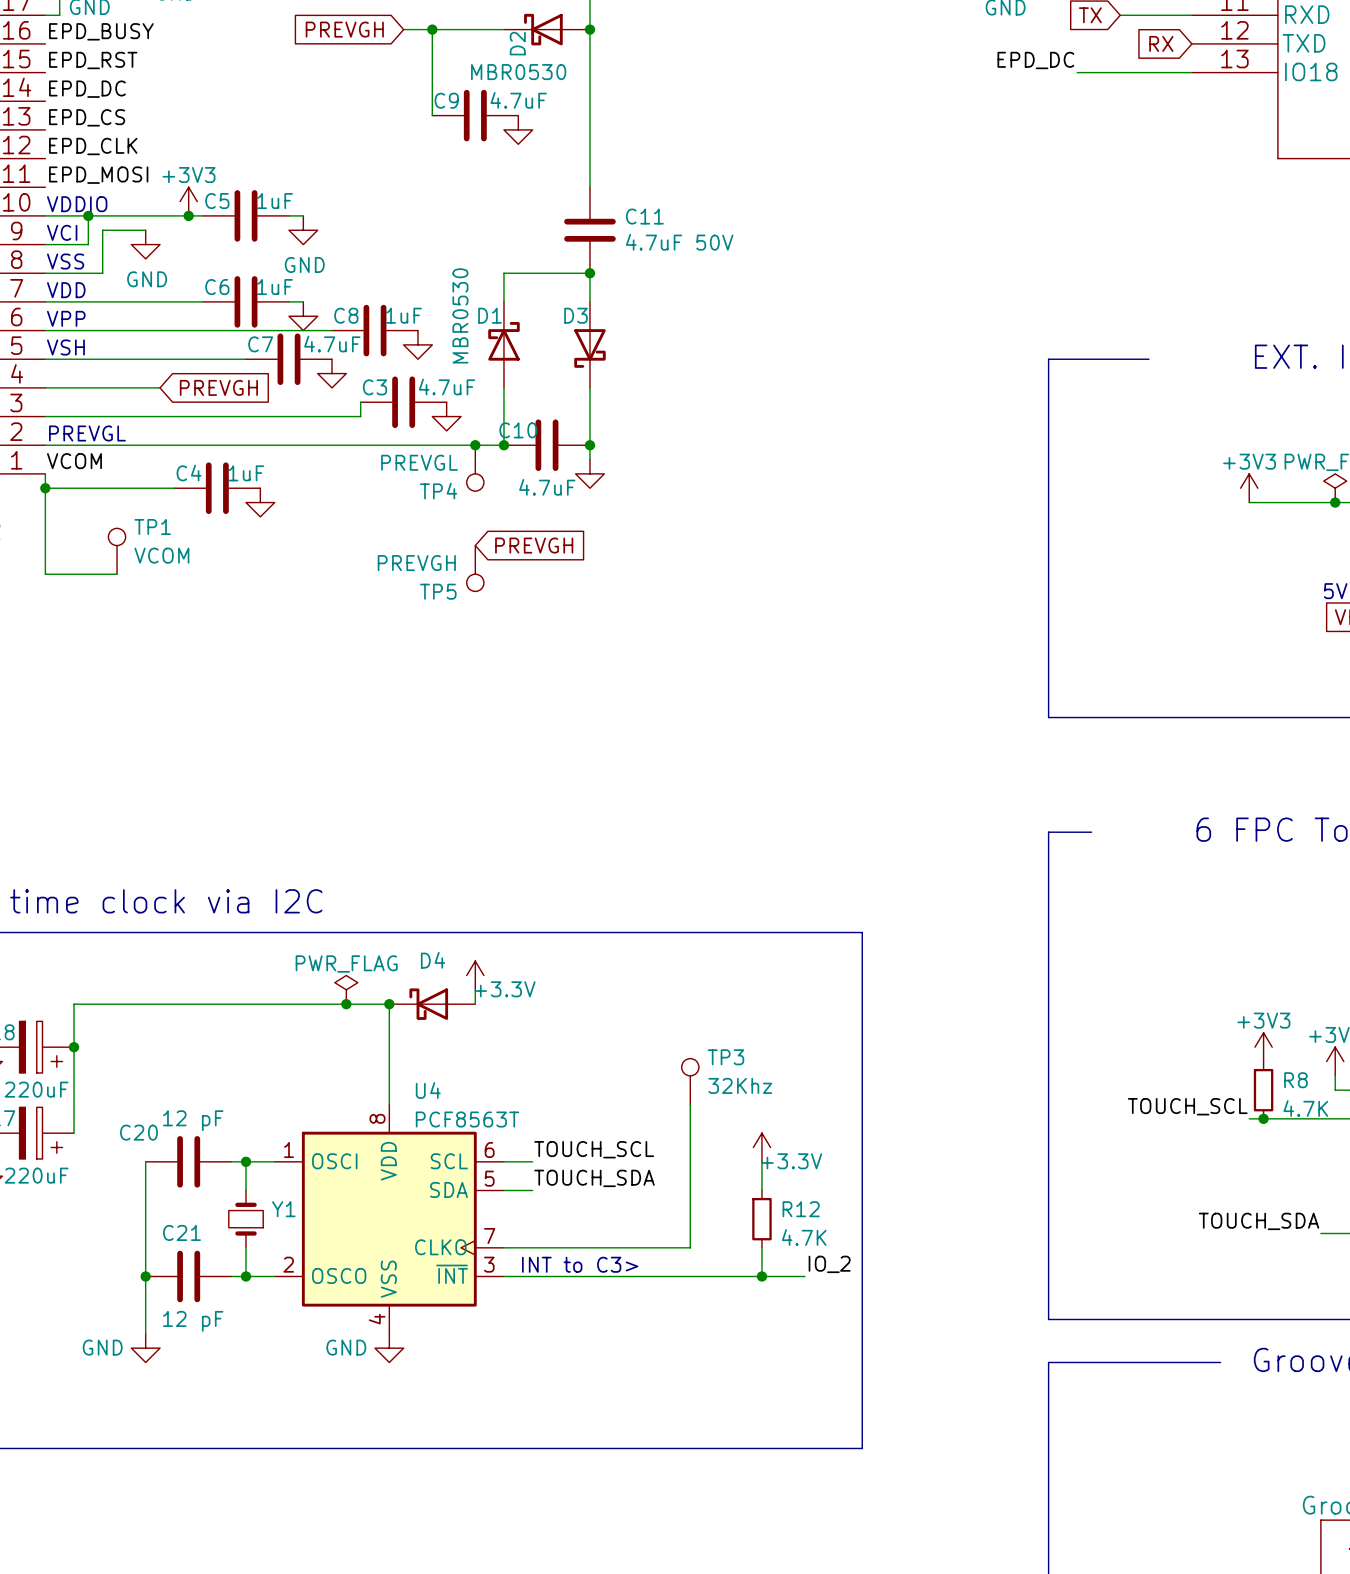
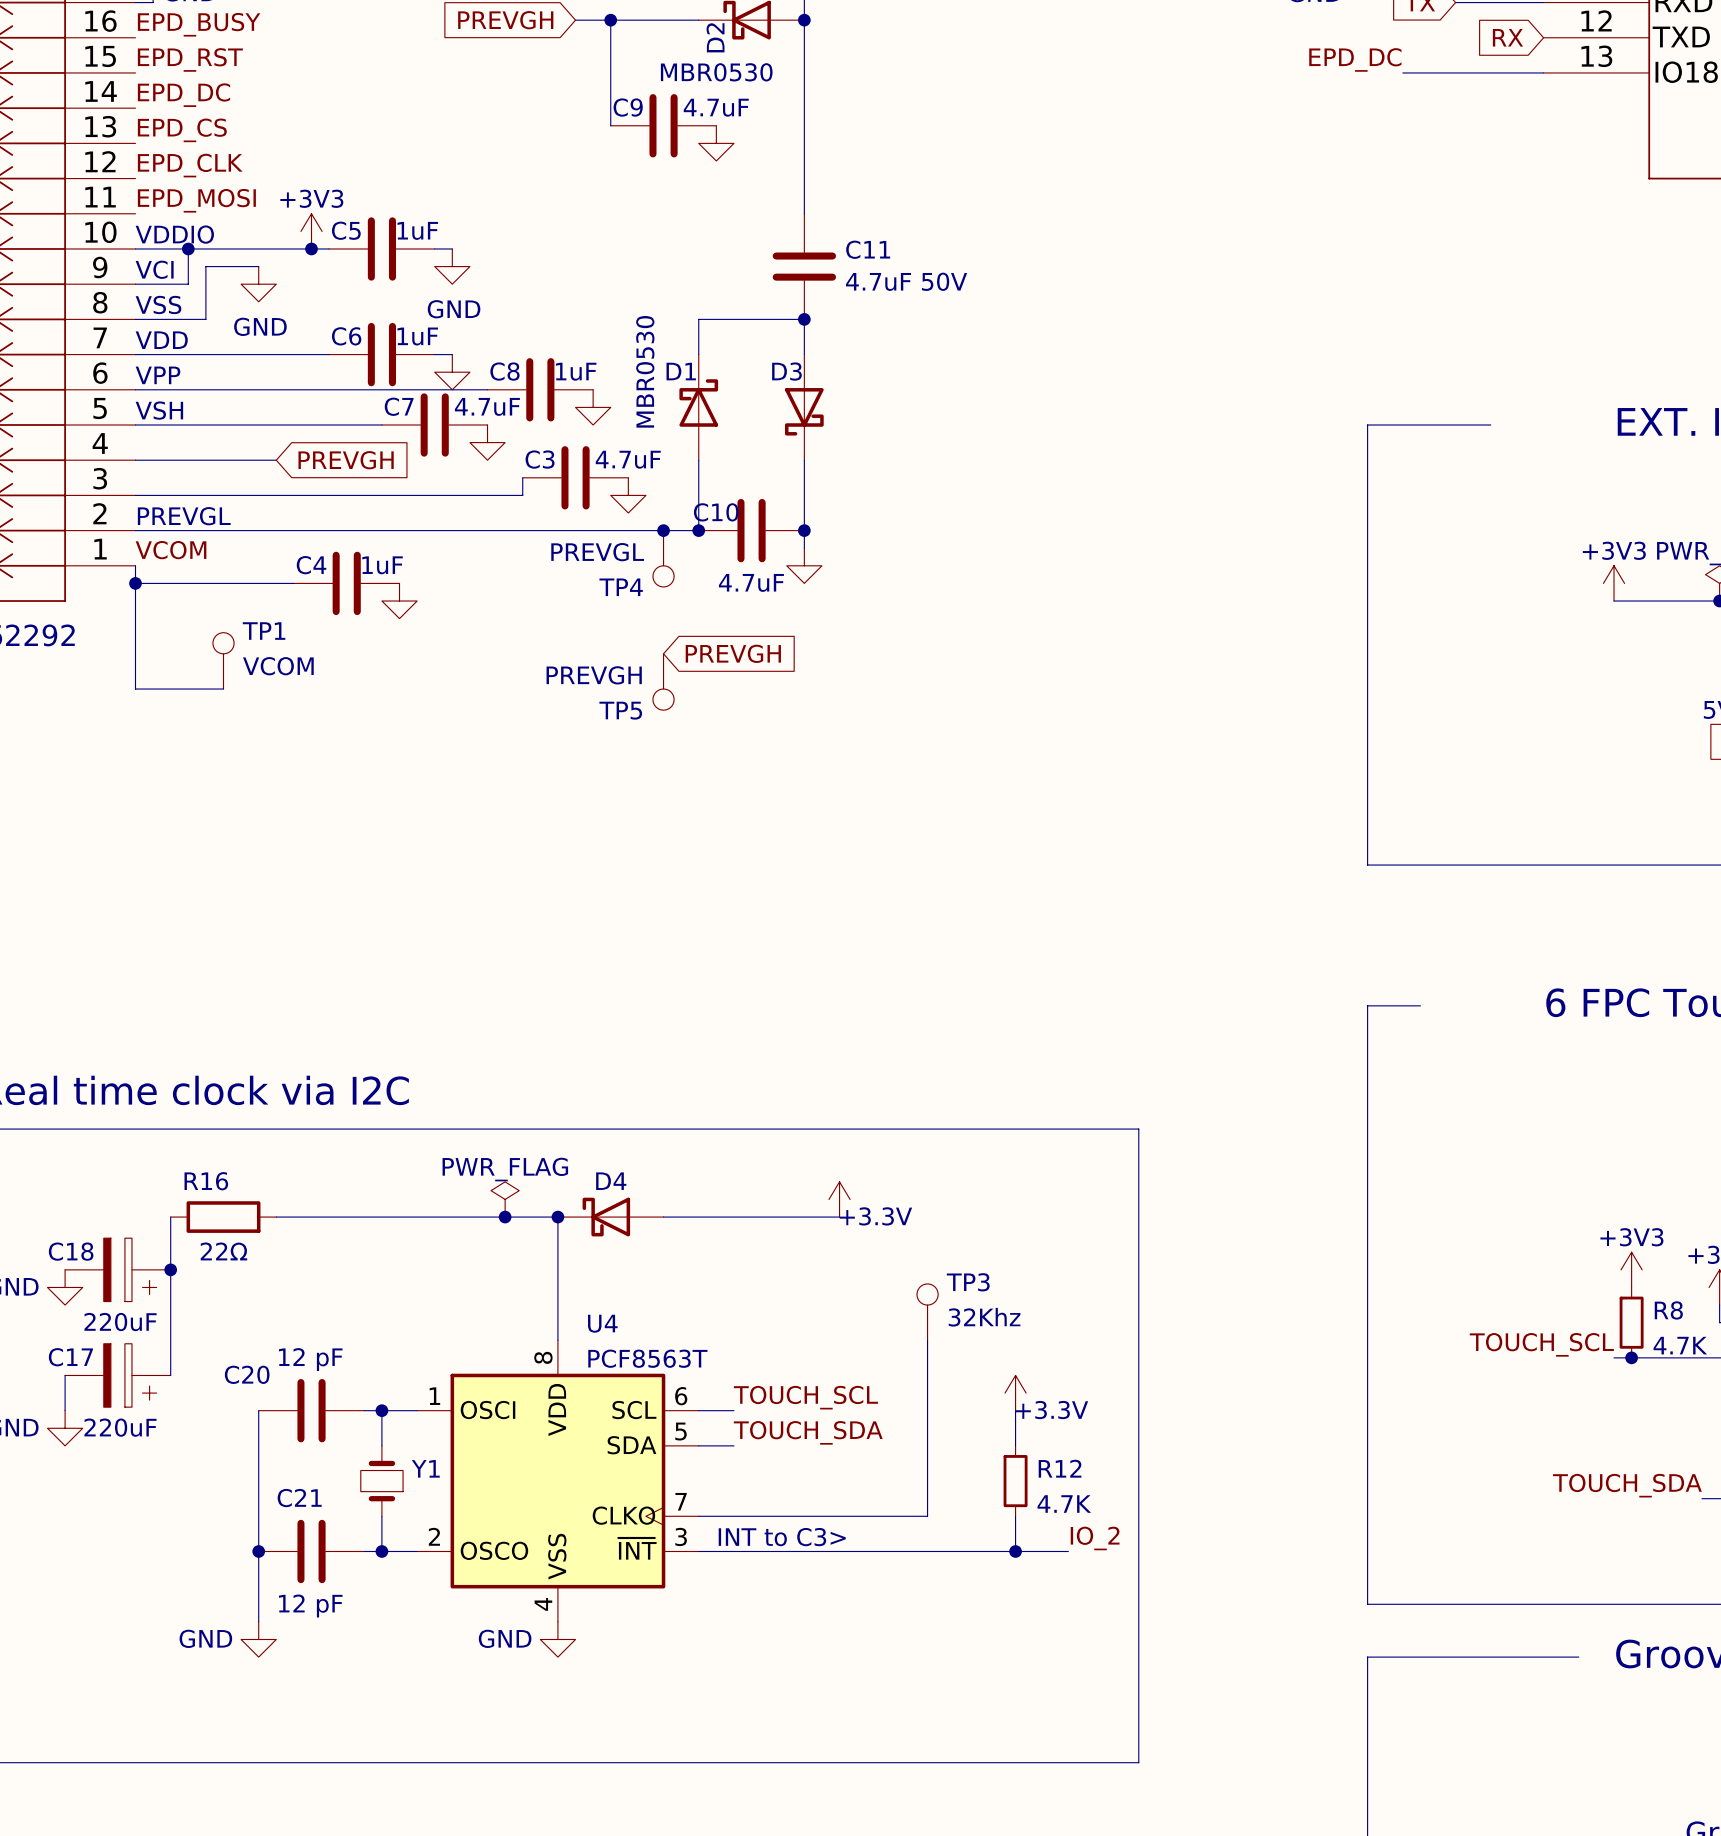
D4 name position: D4 (433, 960) -> D4 (611, 1181)
power symbol position: +3.3V (475, 975) -> +3.3V (839, 1199)
wire: (475, 989) (475, 1004) -> (839, 1217) (663, 1217)
wire: (74, 1004) (160, 1004) -> none
R16: none -> 22Ω (223, 1217)

